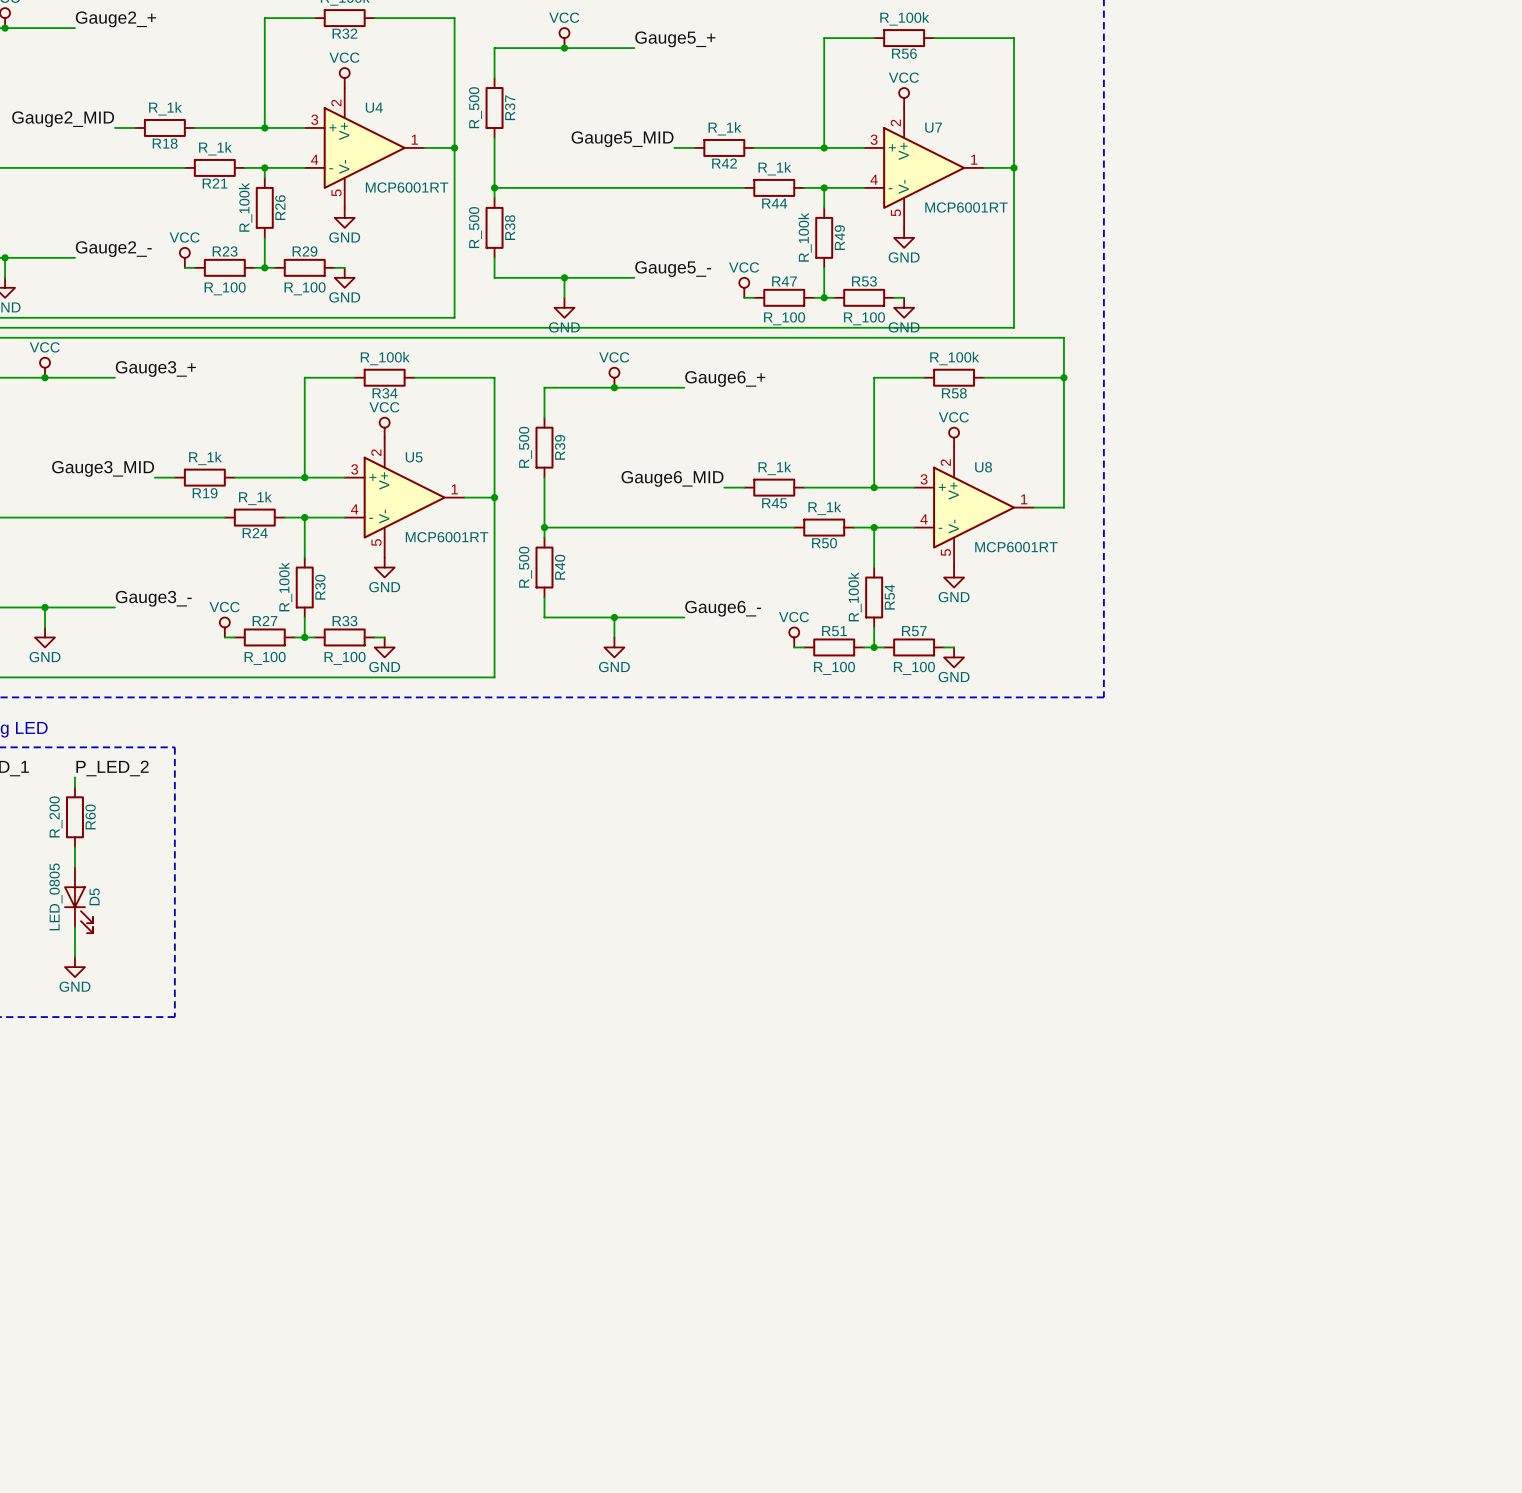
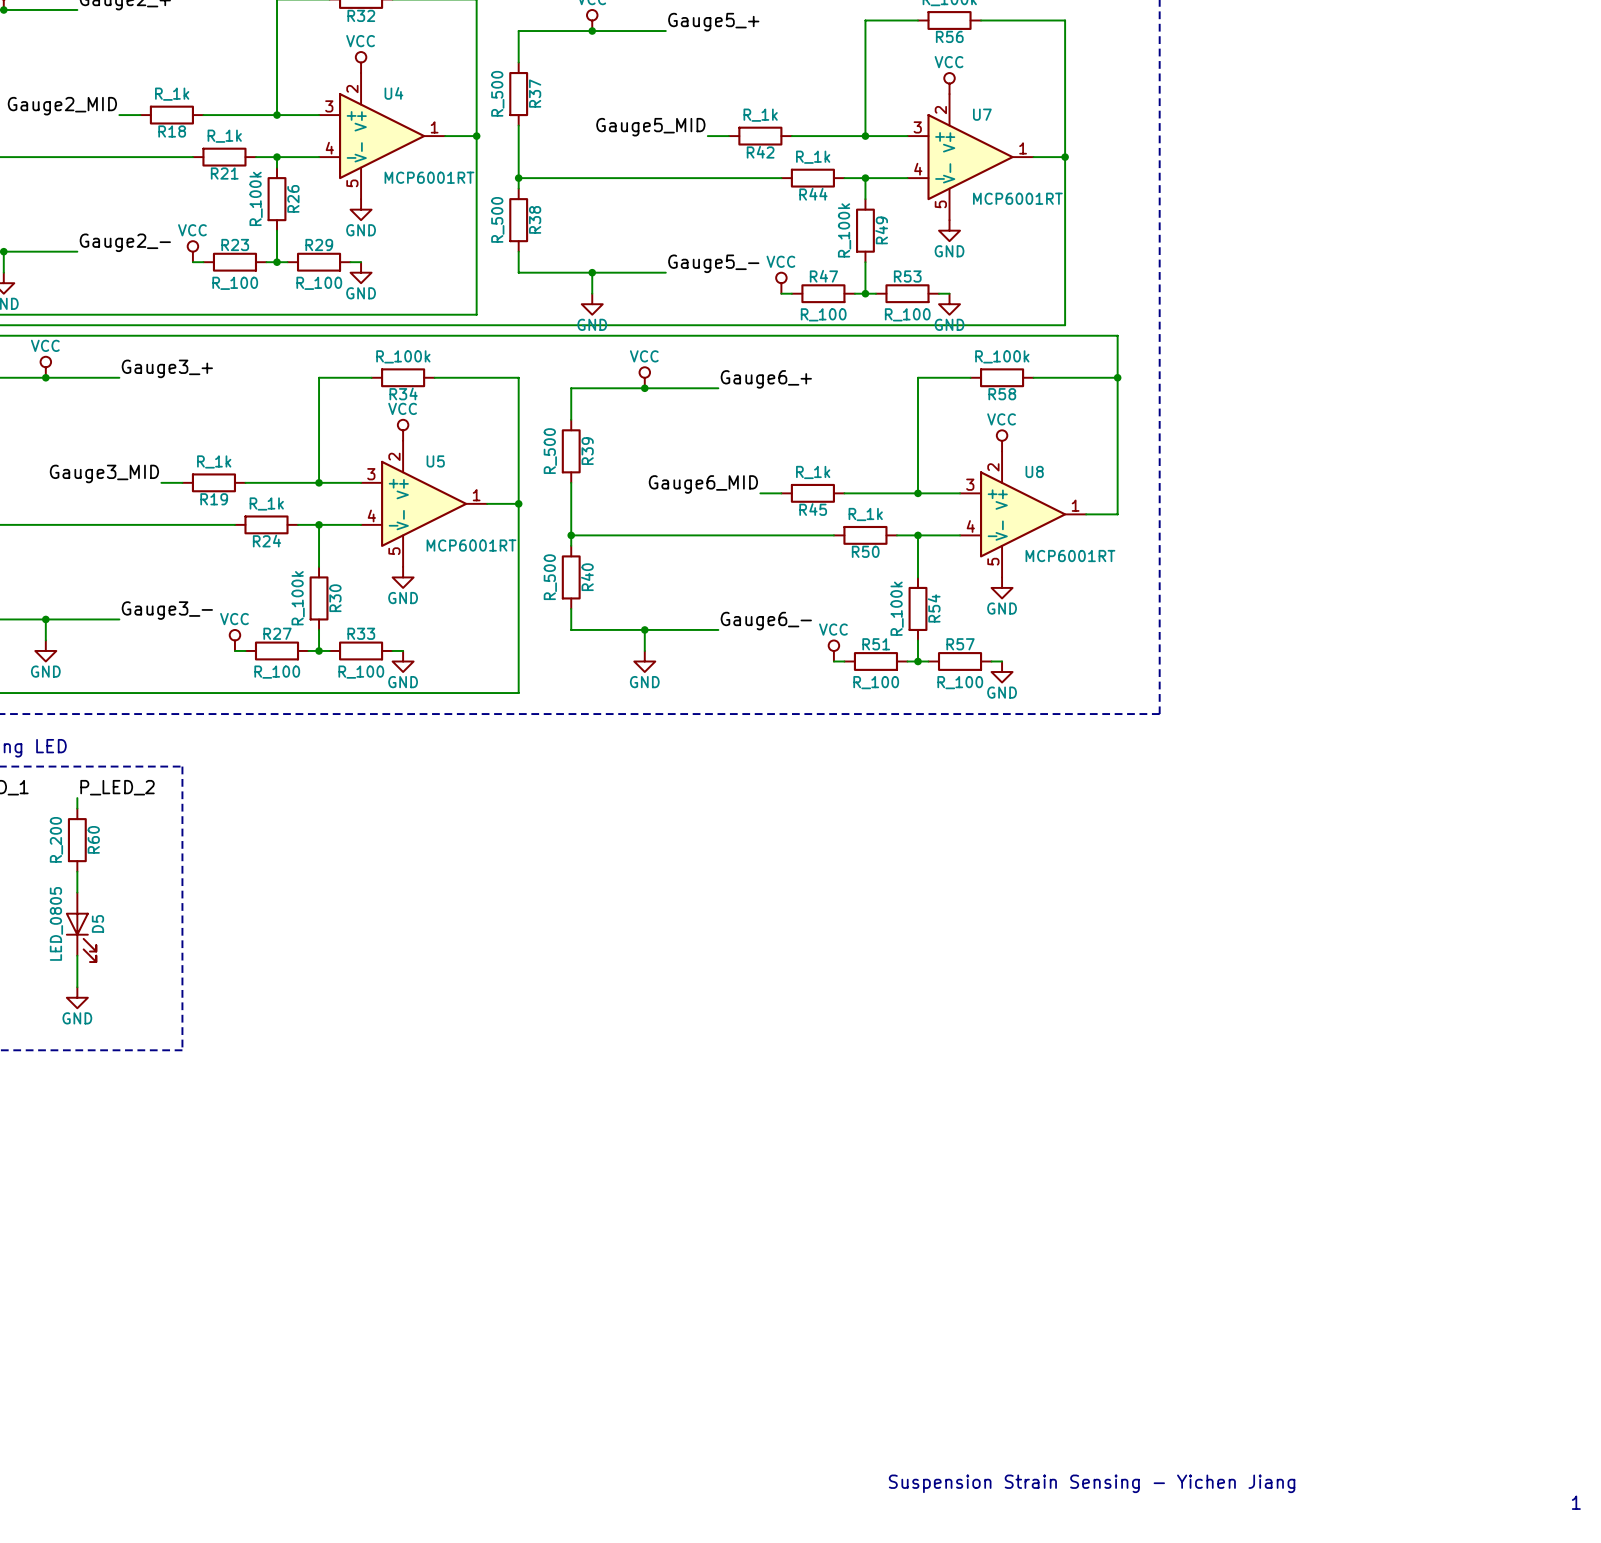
text: none -> Suspension Strain Sensing - Yichen Jiang (1092, 1483)
text: none -> 1 (1576, 1502)

